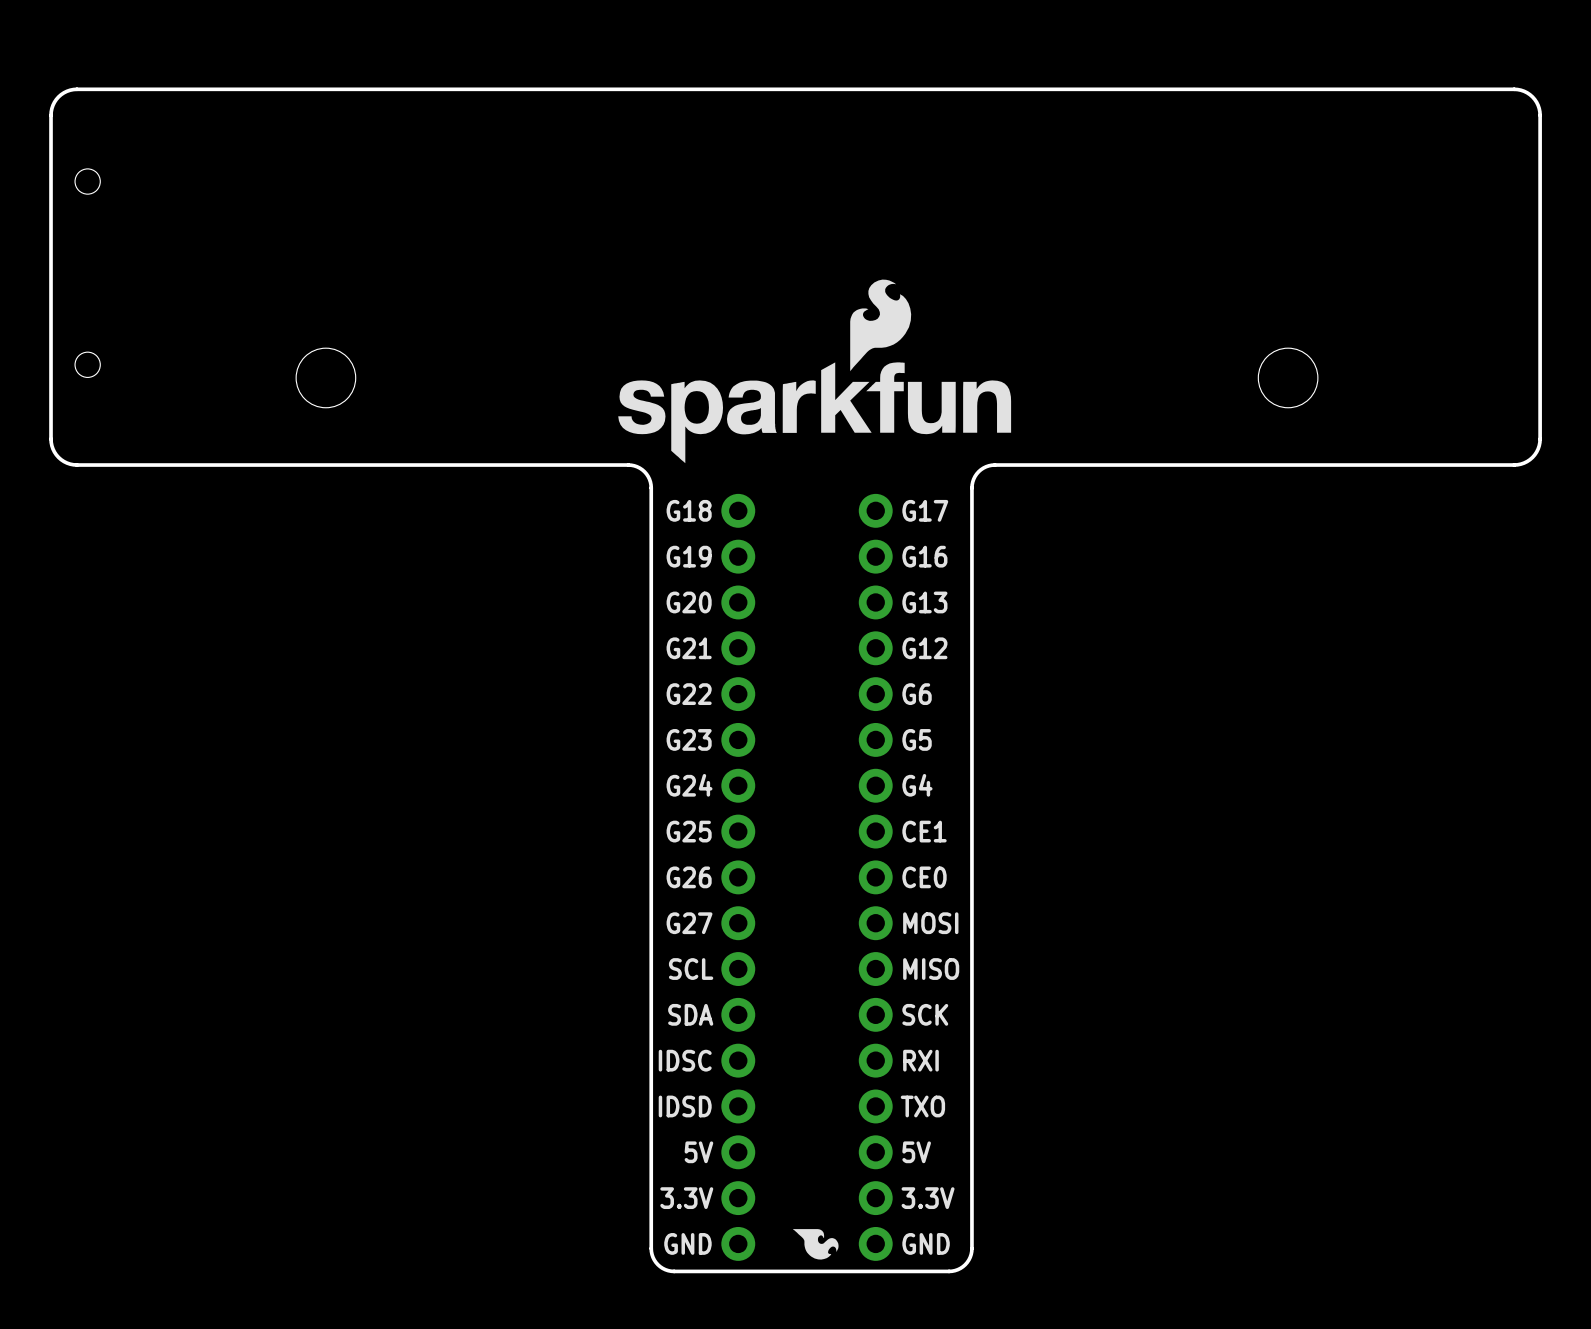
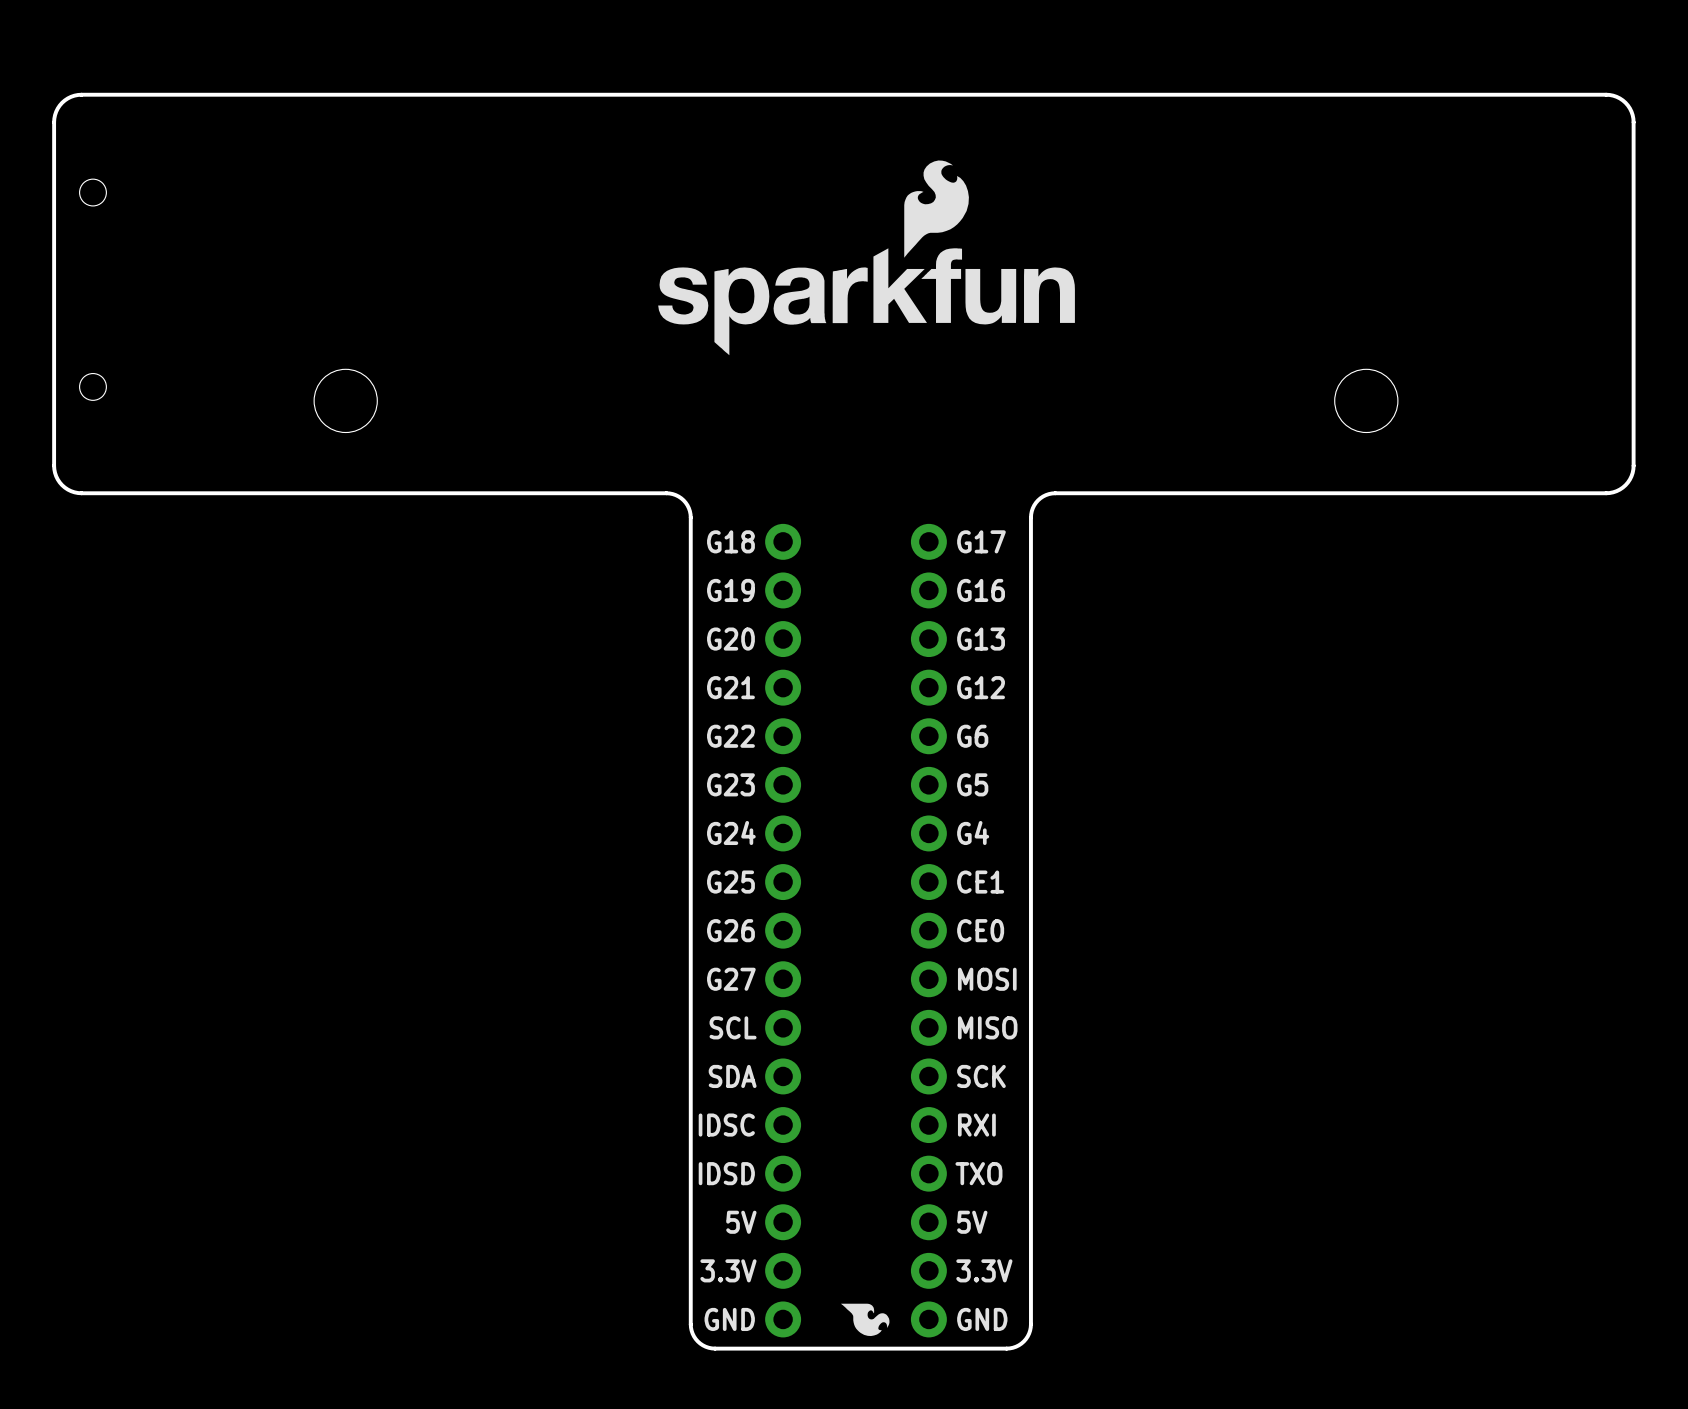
drawing position: (814, 371) -> (866, 257)

